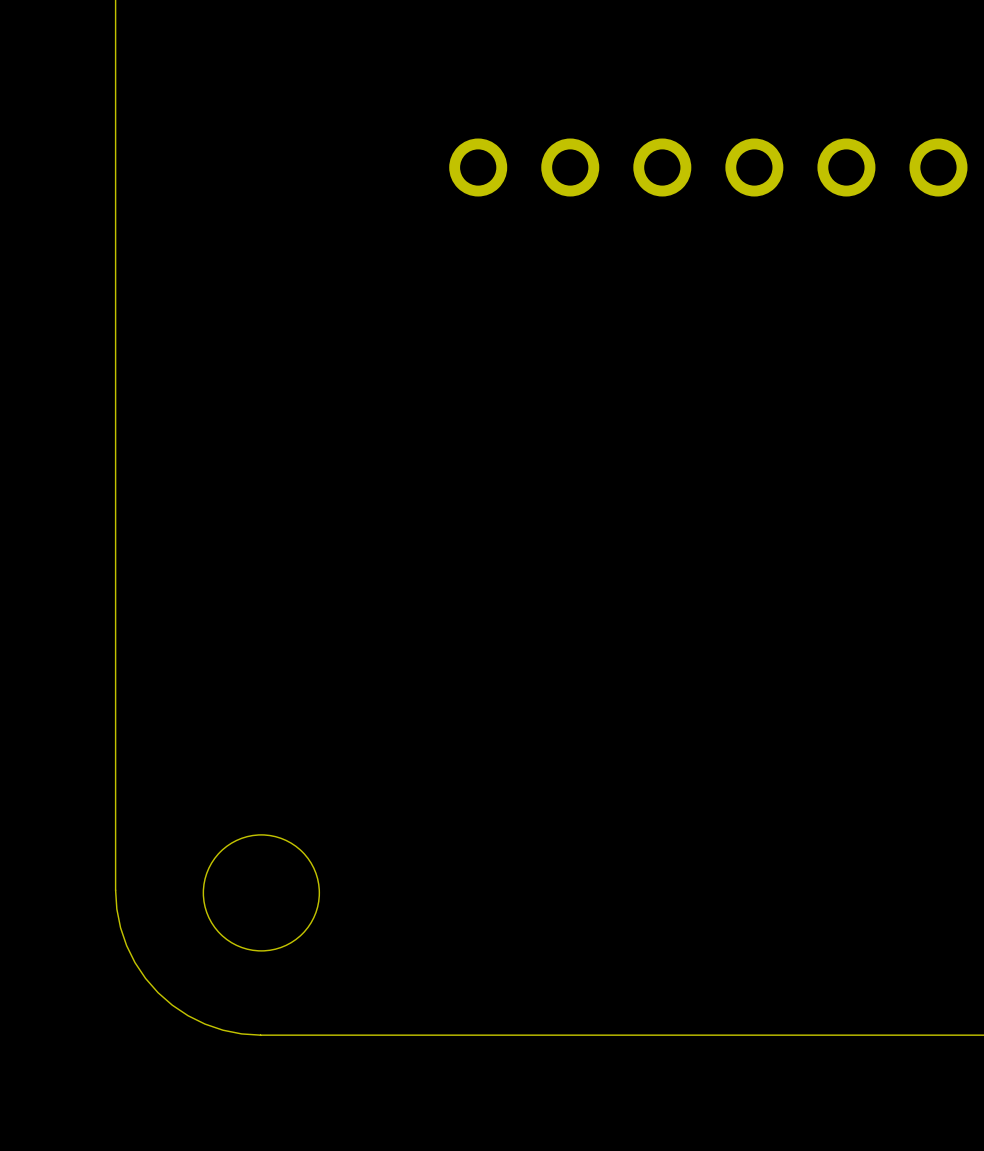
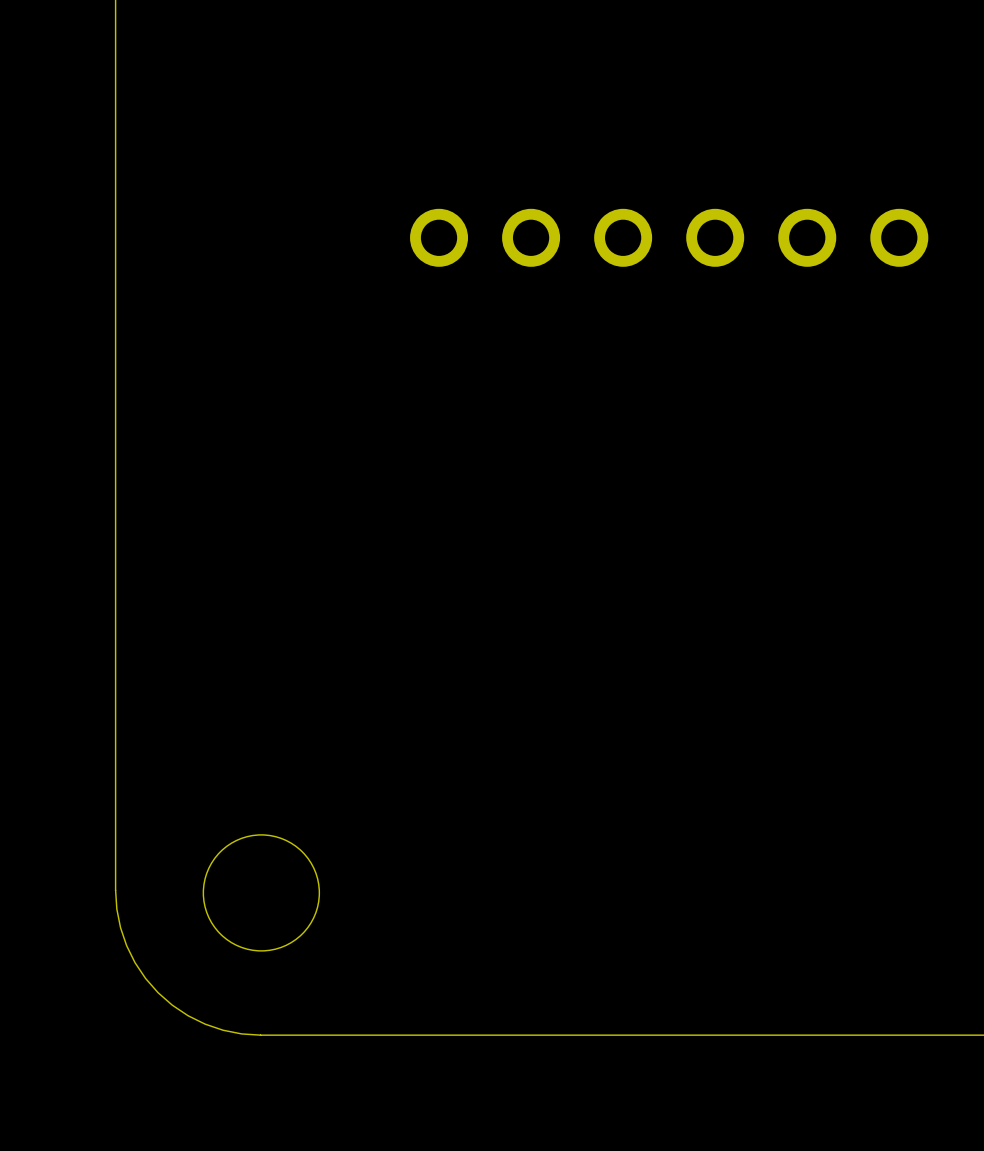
part position: (708, 167) -> (669, 237)

